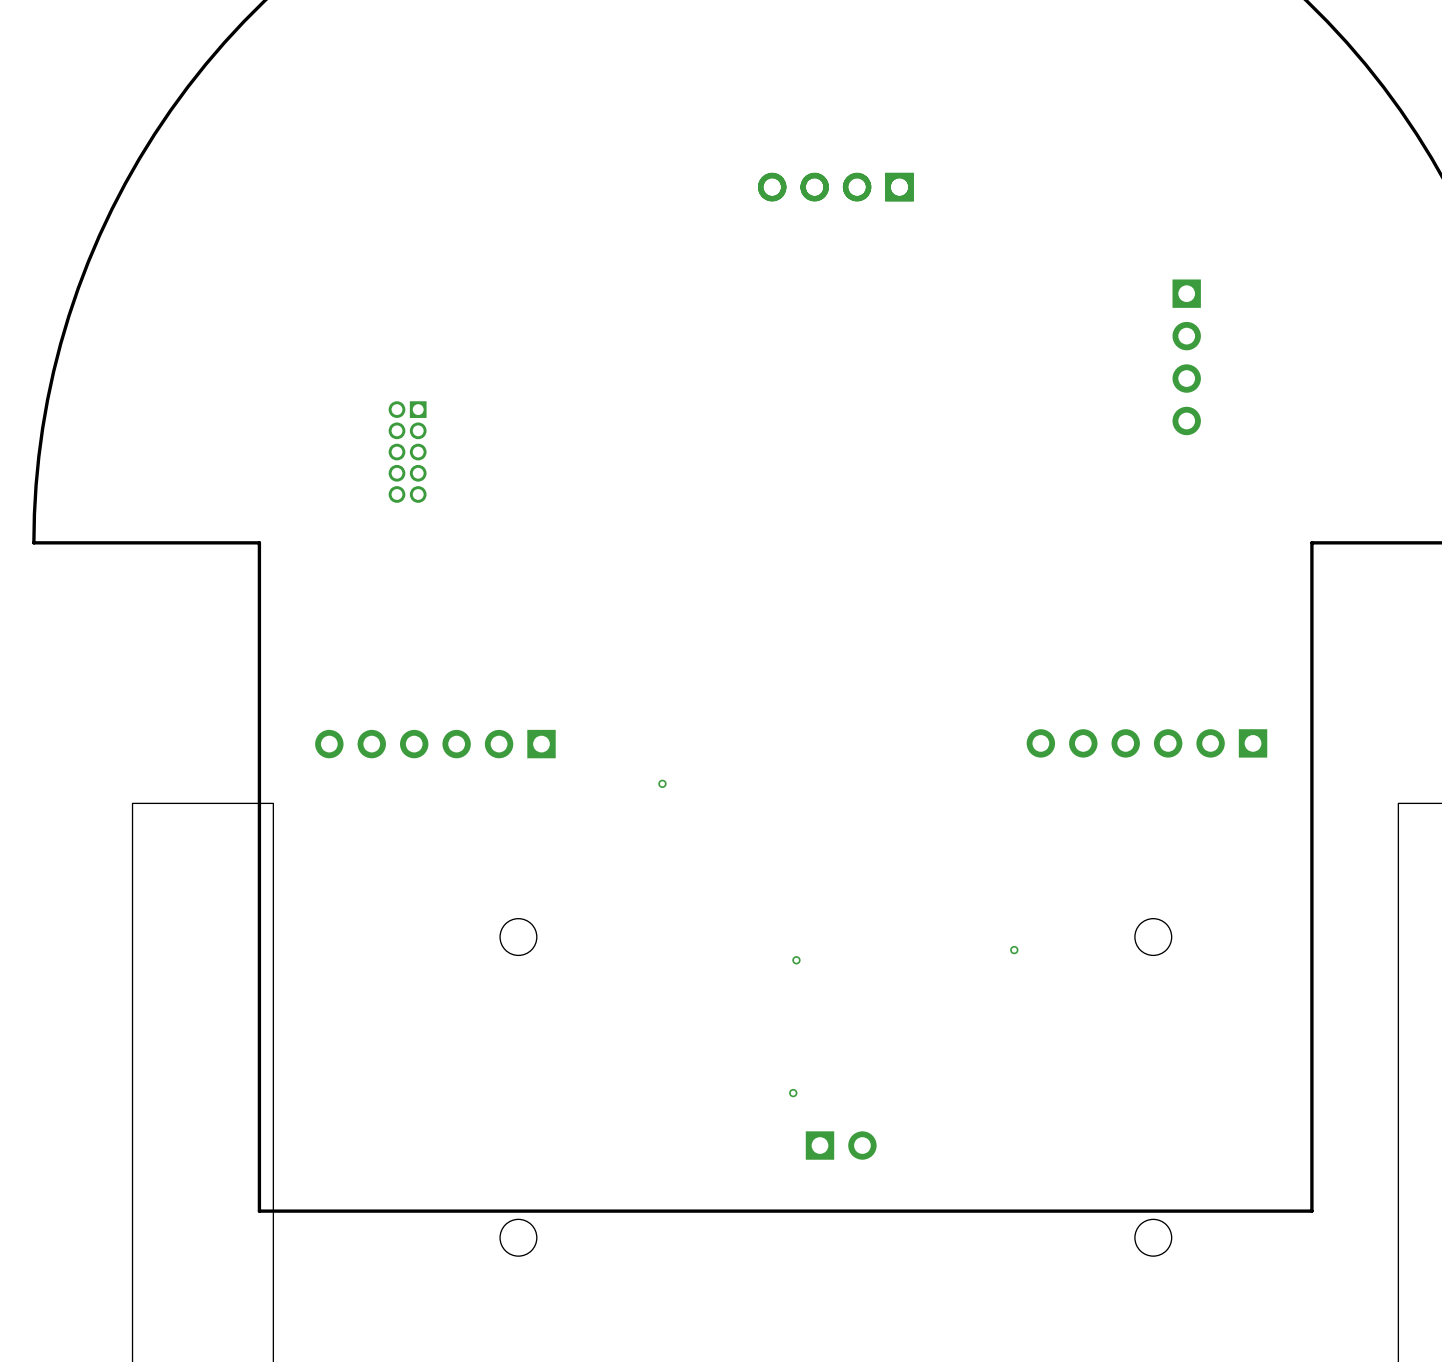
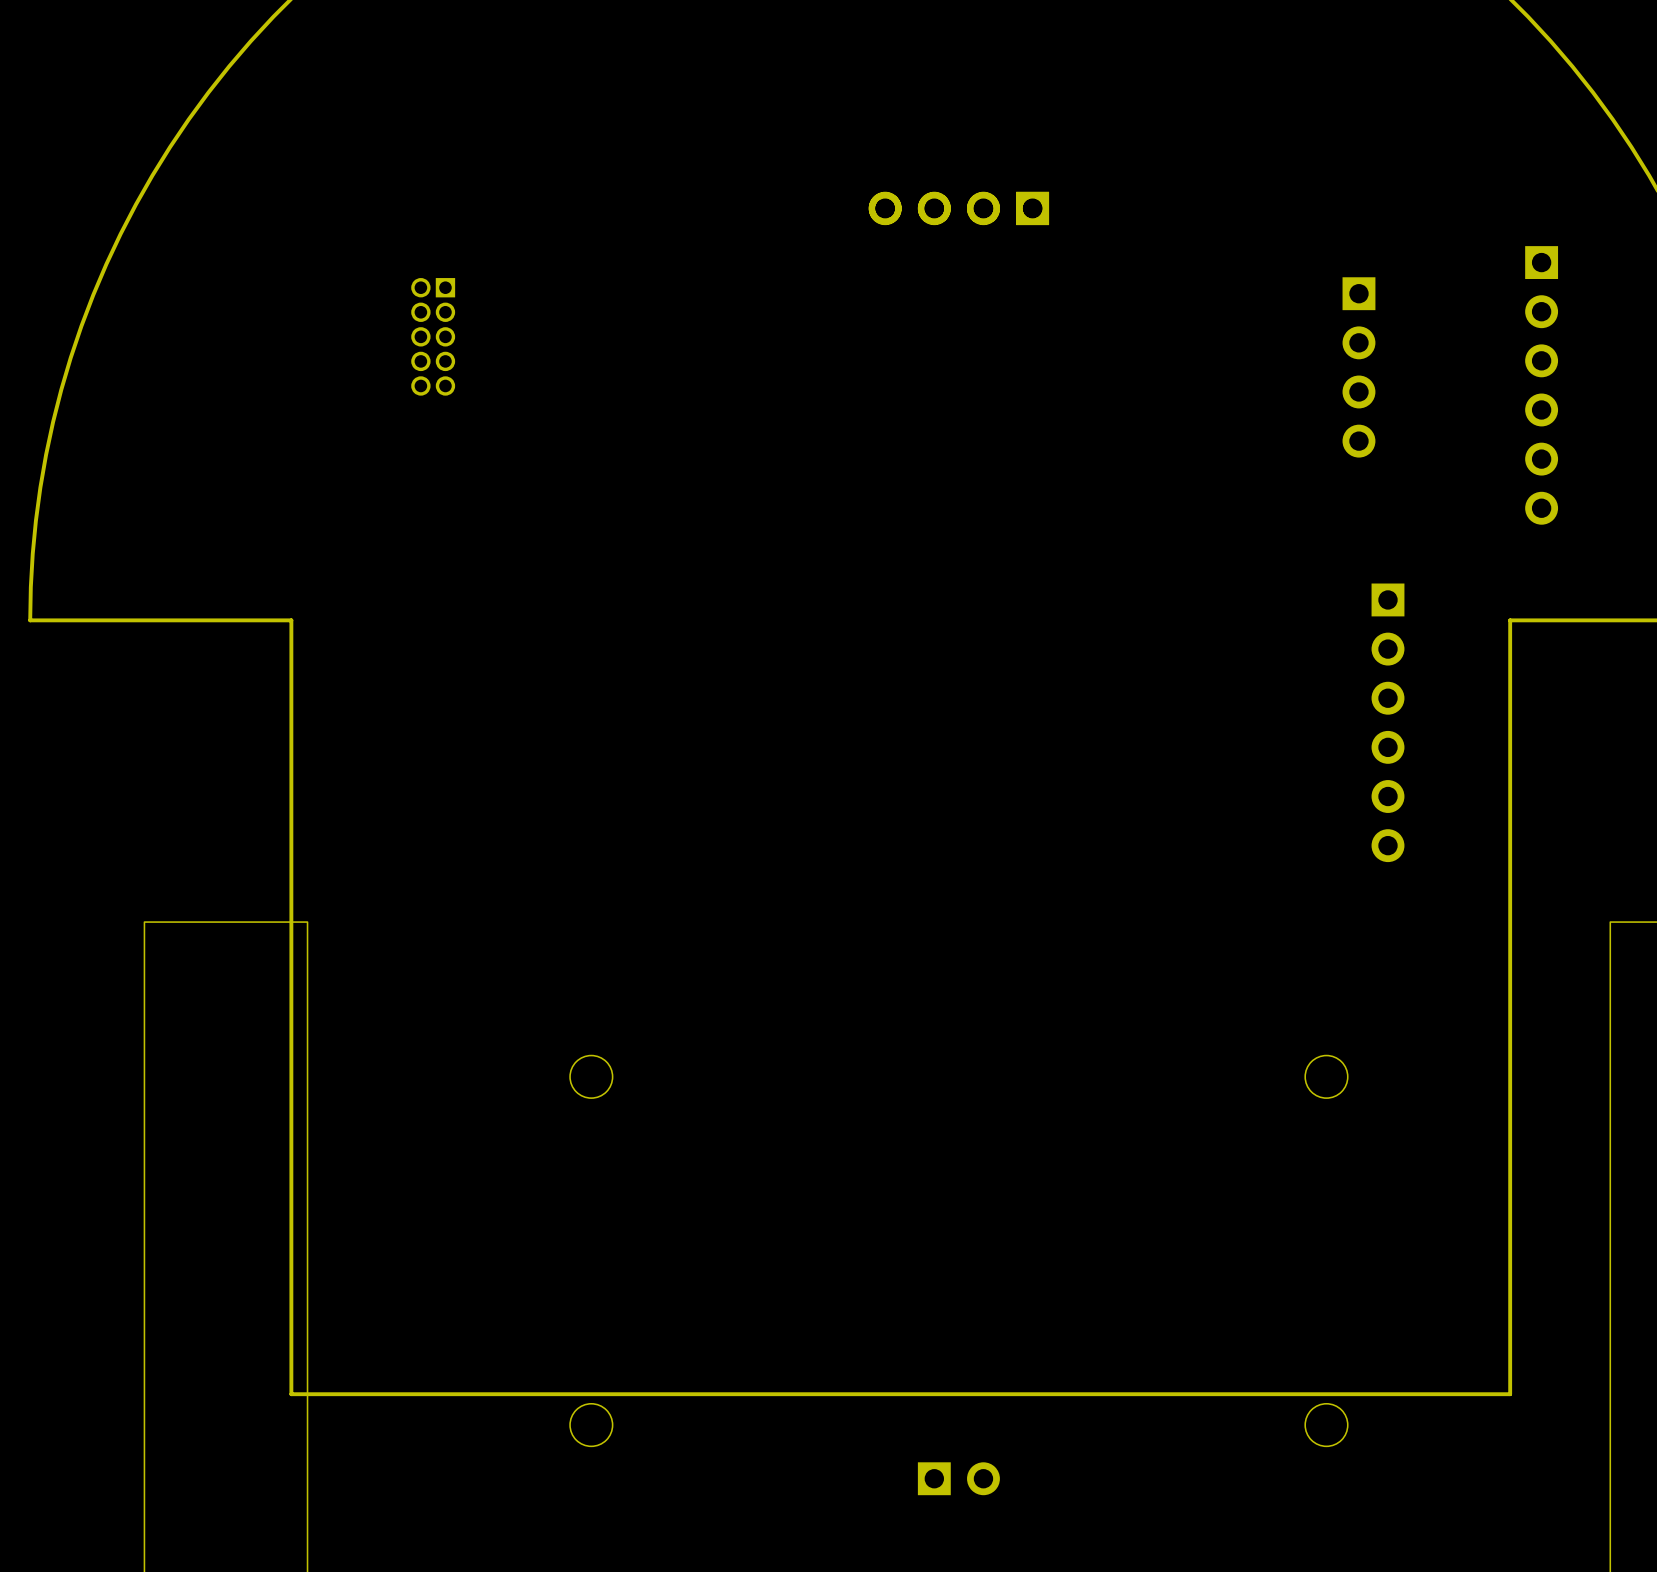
part: none -> (1541, 385)
part position: (1186, 357) -> (1358, 367)
part position: (407, 452) -> (433, 336)
part rotation: 0° (1146, 743) -> 90° counterclockwise (1387, 722)
part: (435, 744) -> none
via: (662, 783) -> none
via: (1014, 950) -> none
via: (796, 960) -> none
via: (793, 1093) -> none
part position: (841, 1145) -> (958, 1478)

